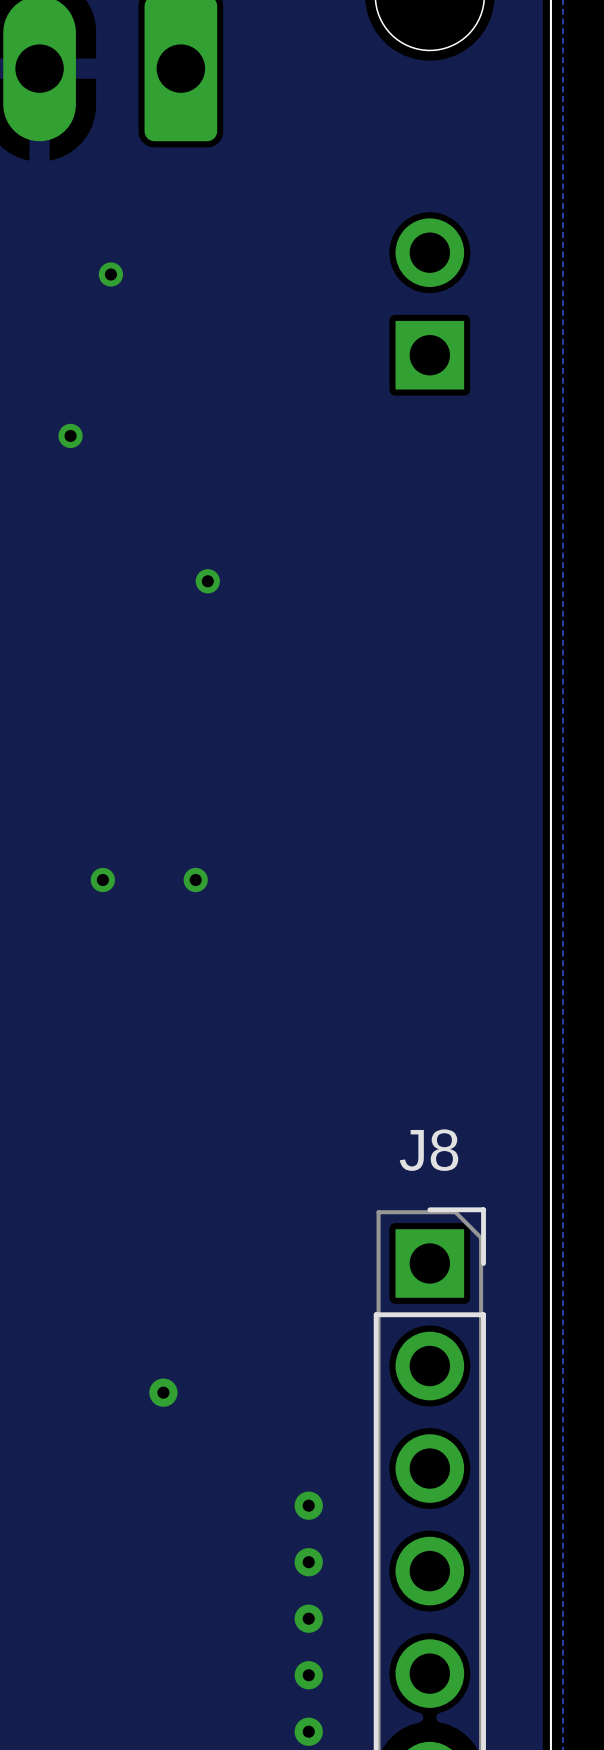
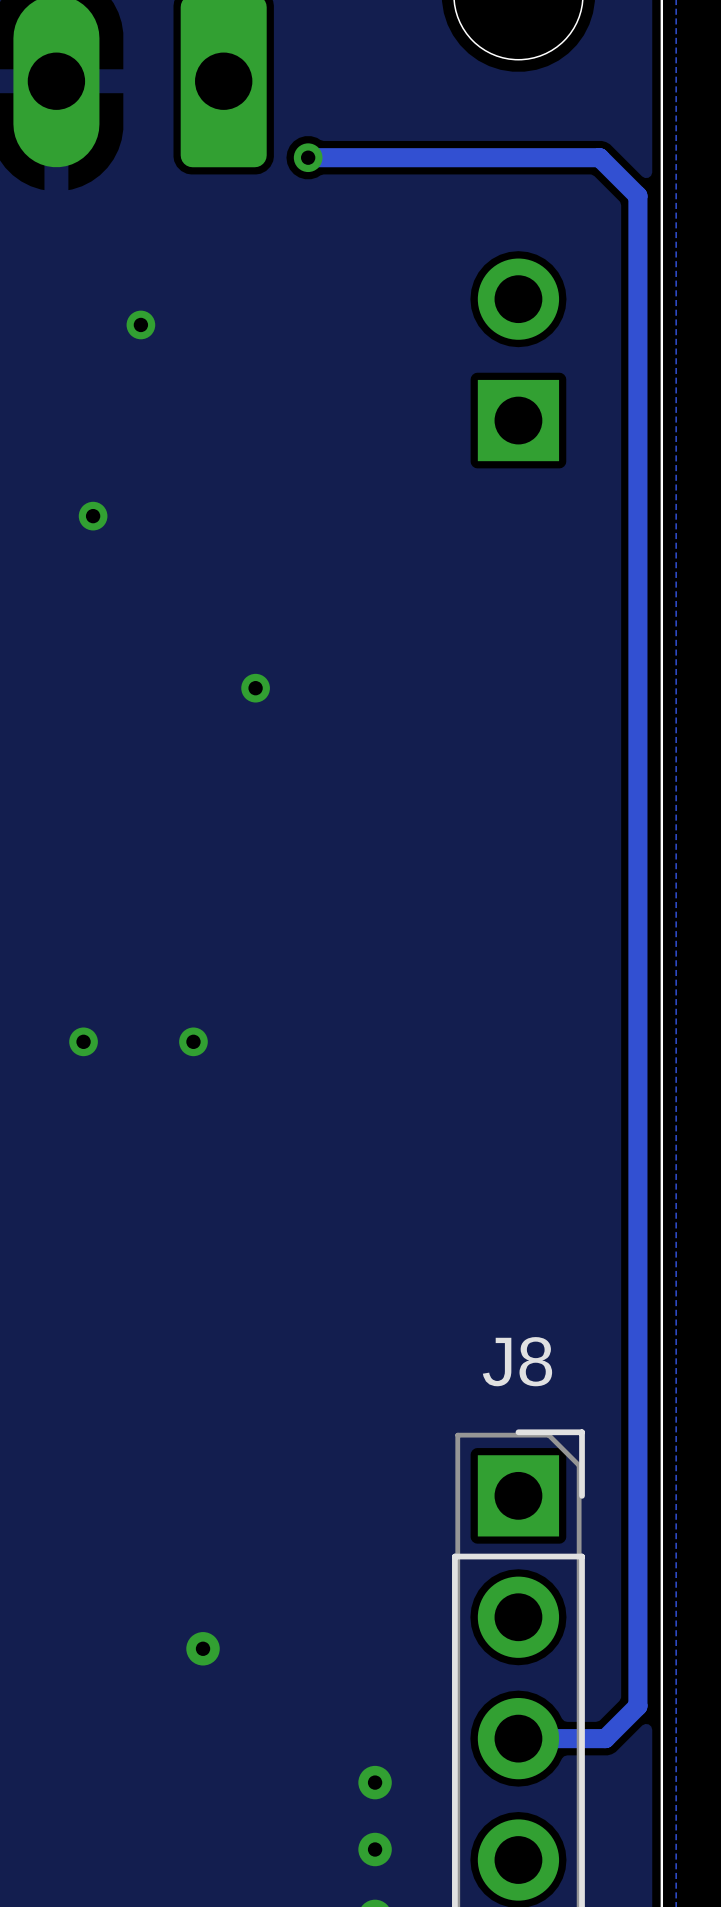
track: none -> (308, 157) (599, 157) (637, 195) (637, 1706) (605, 1738) (518, 1738)
via: none -> (308, 157)
via: none -> (83, 1041)
via: (102, 879) -> none
via: none -> (193, 1041)
via: (195, 879) -> none

